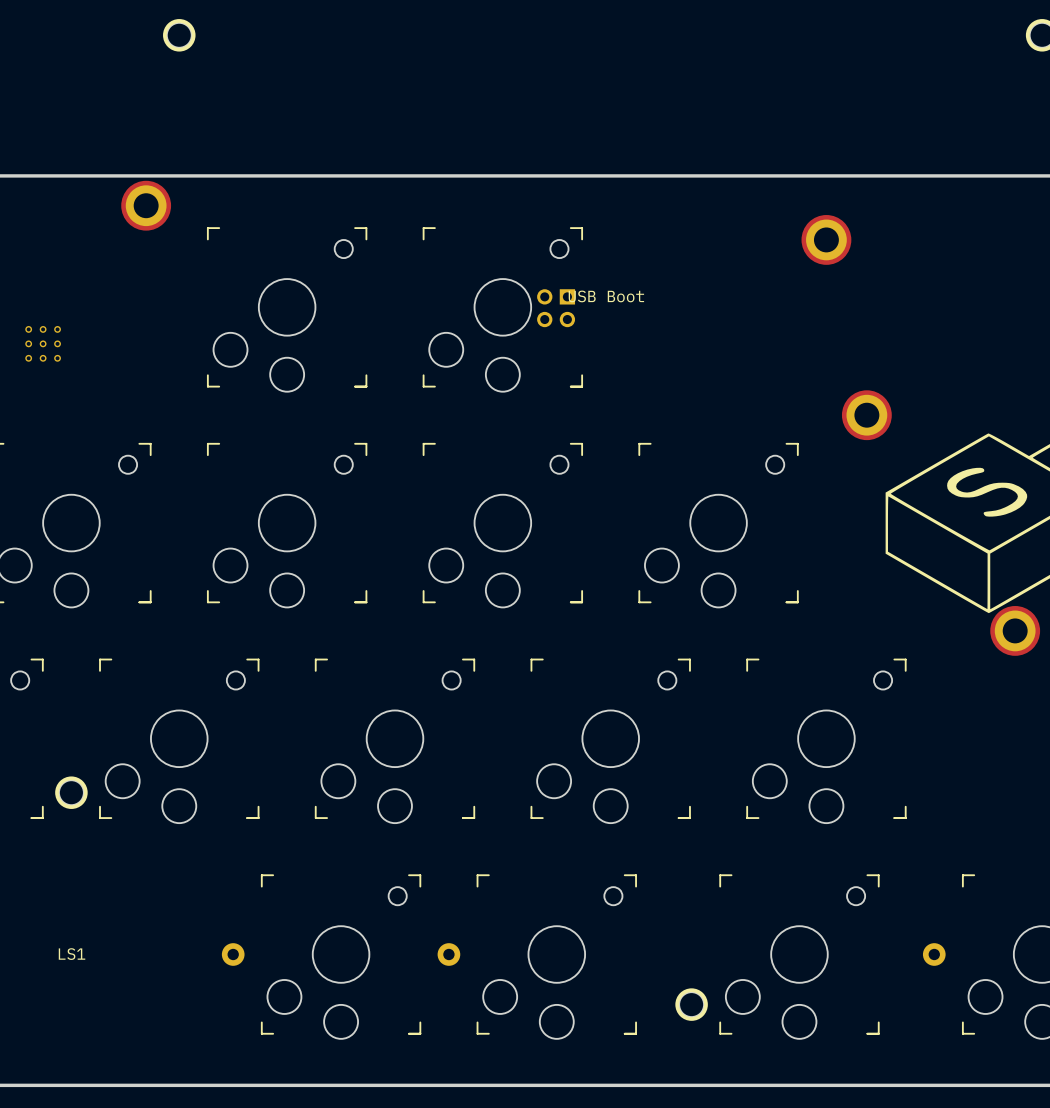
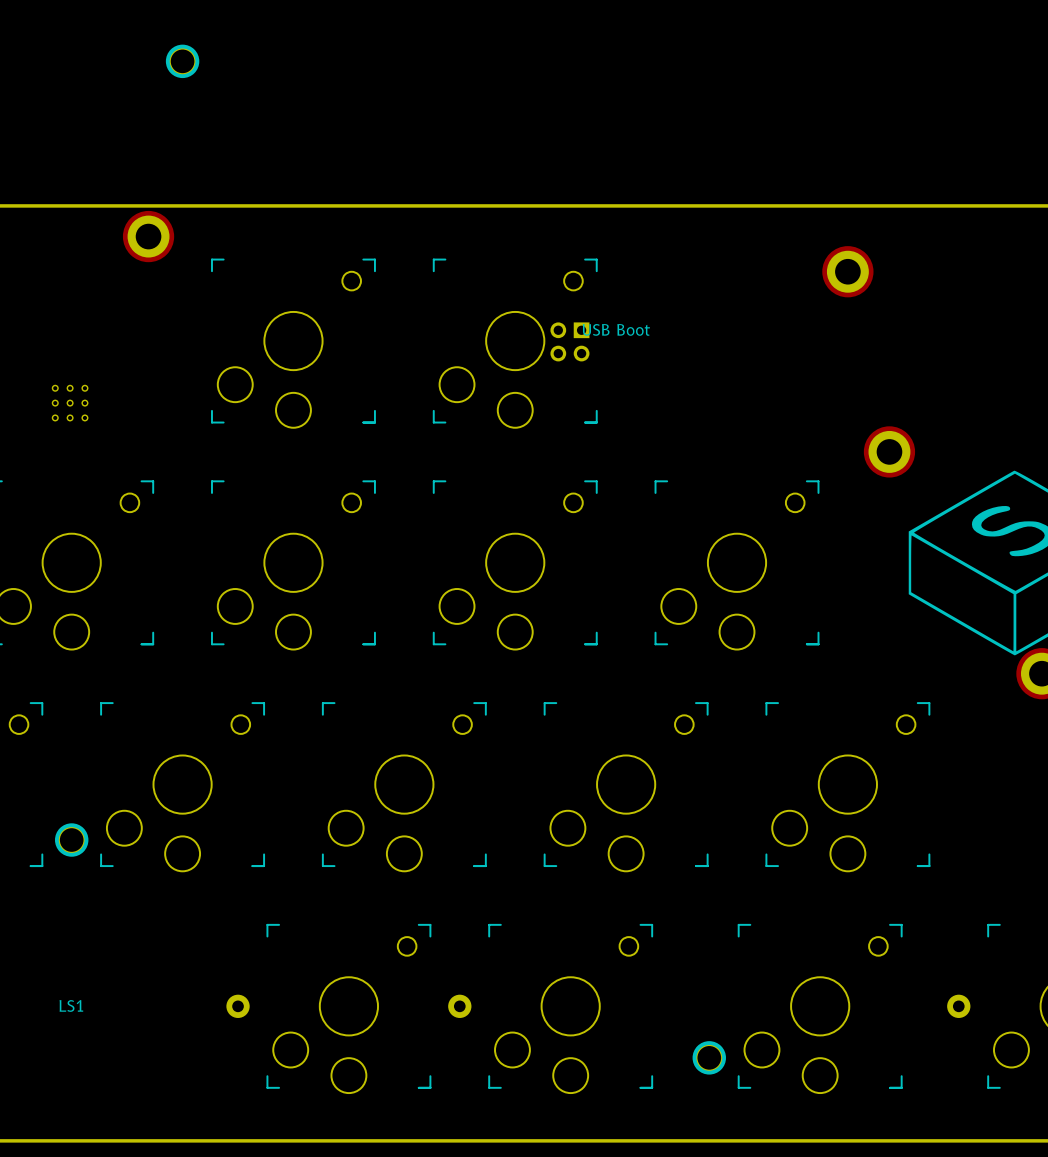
part position: (43, 343) -> (70, 403)

